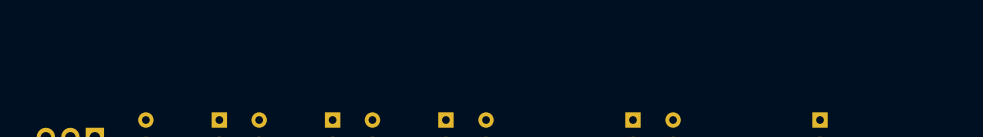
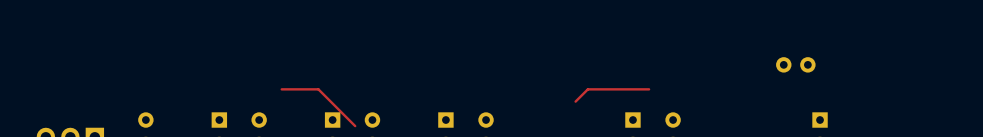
part: none -> (795, 64)
top track: none -> (281, 89) (318, 89) (355, 126)
top track: none -> (649, 89) (587, 89) (575, 101)

